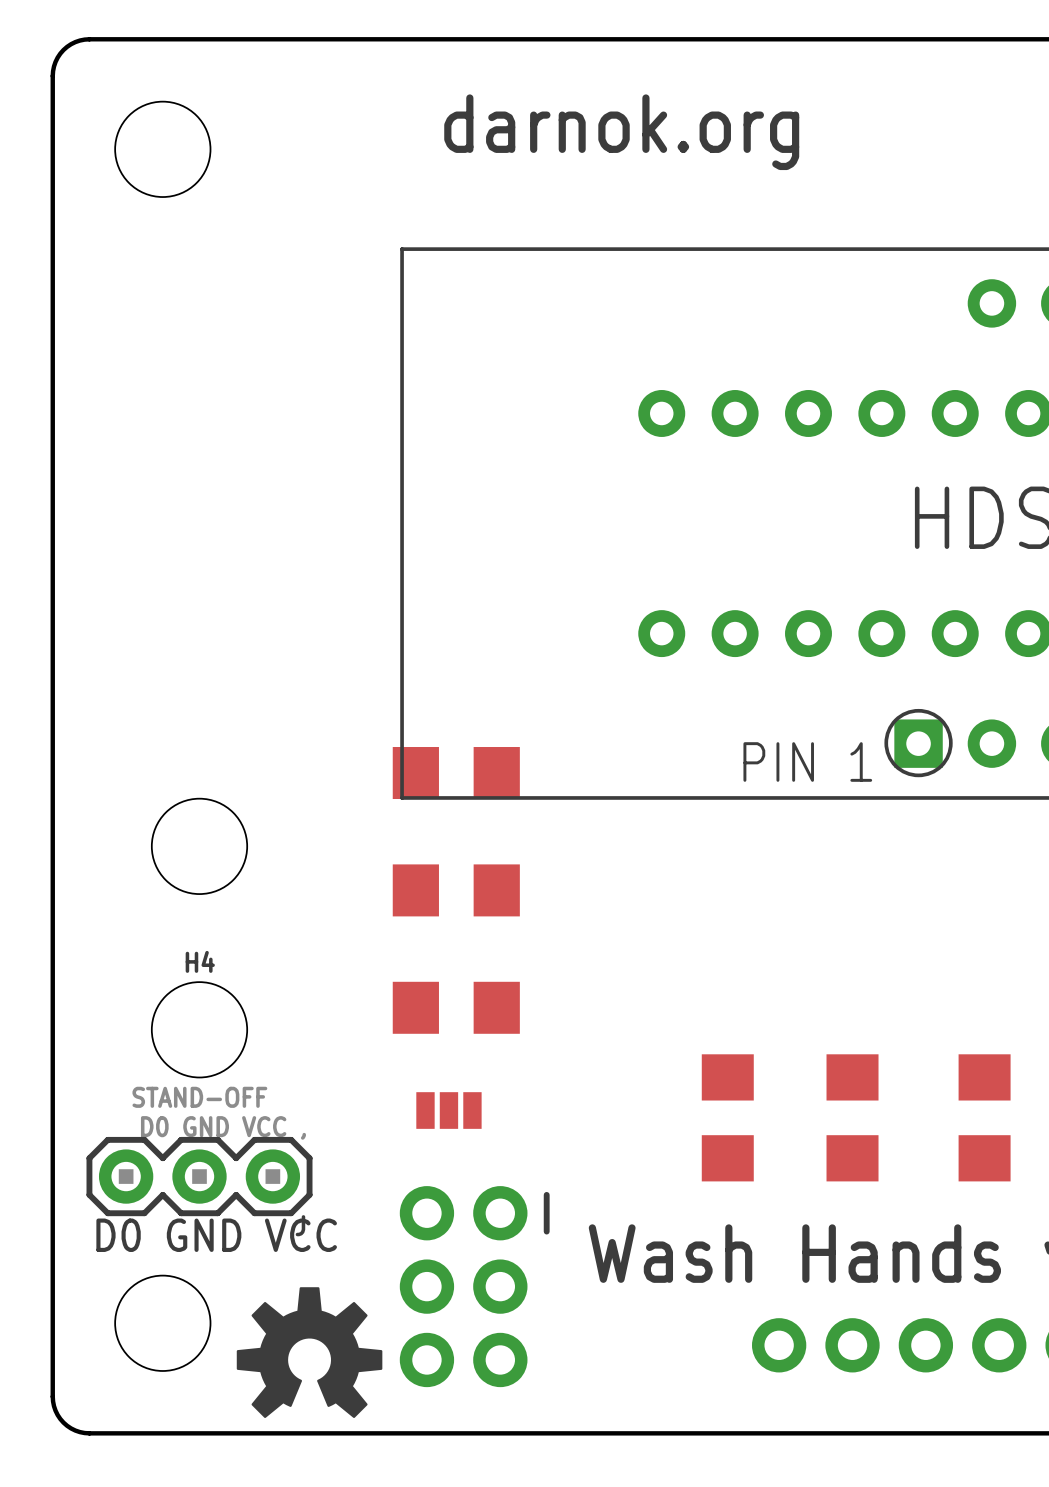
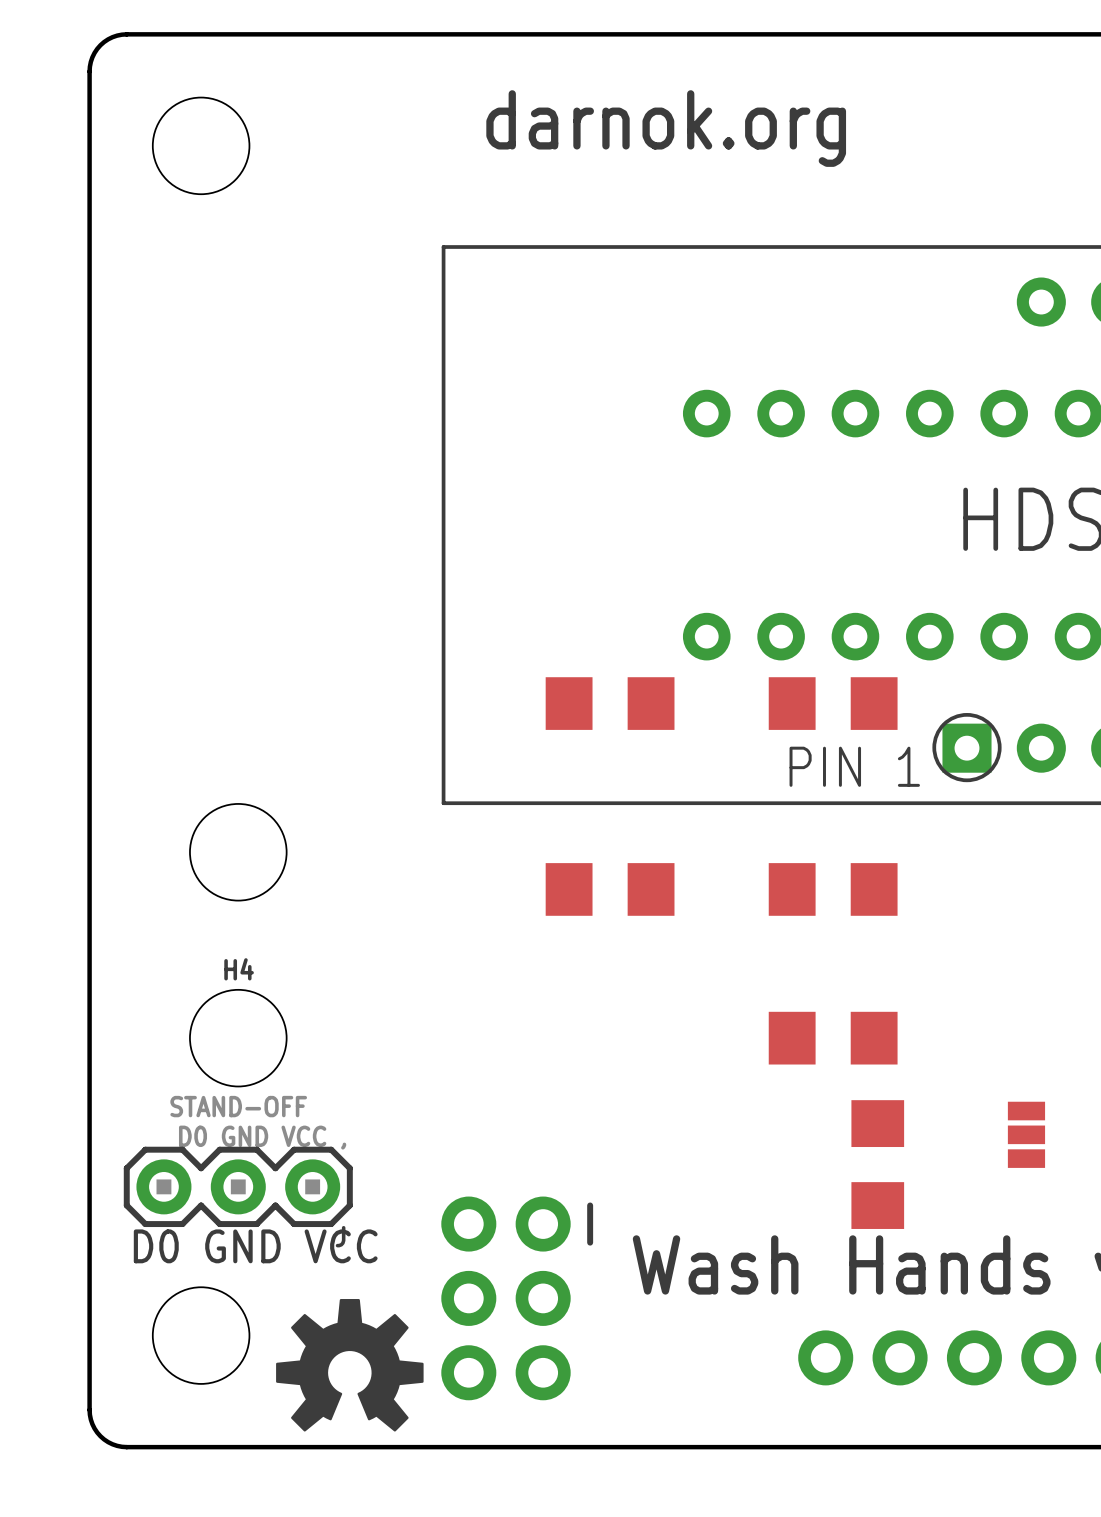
part: none -> (610, 703)
part: none -> (833, 703)
part: (456, 773) -> none
part: none -> (610, 889)
part: none -> (833, 889)
part: (456, 890) -> none
part: (456, 1007) -> none
part: none -> (833, 1038)
part footprint: [958, 1054, 1011, 1182] -> [1007, 1101, 1046, 1168]
part: (448, 1110) -> none
part: (727, 1117) -> none
part position: (852, 1117) -> (877, 1164)

